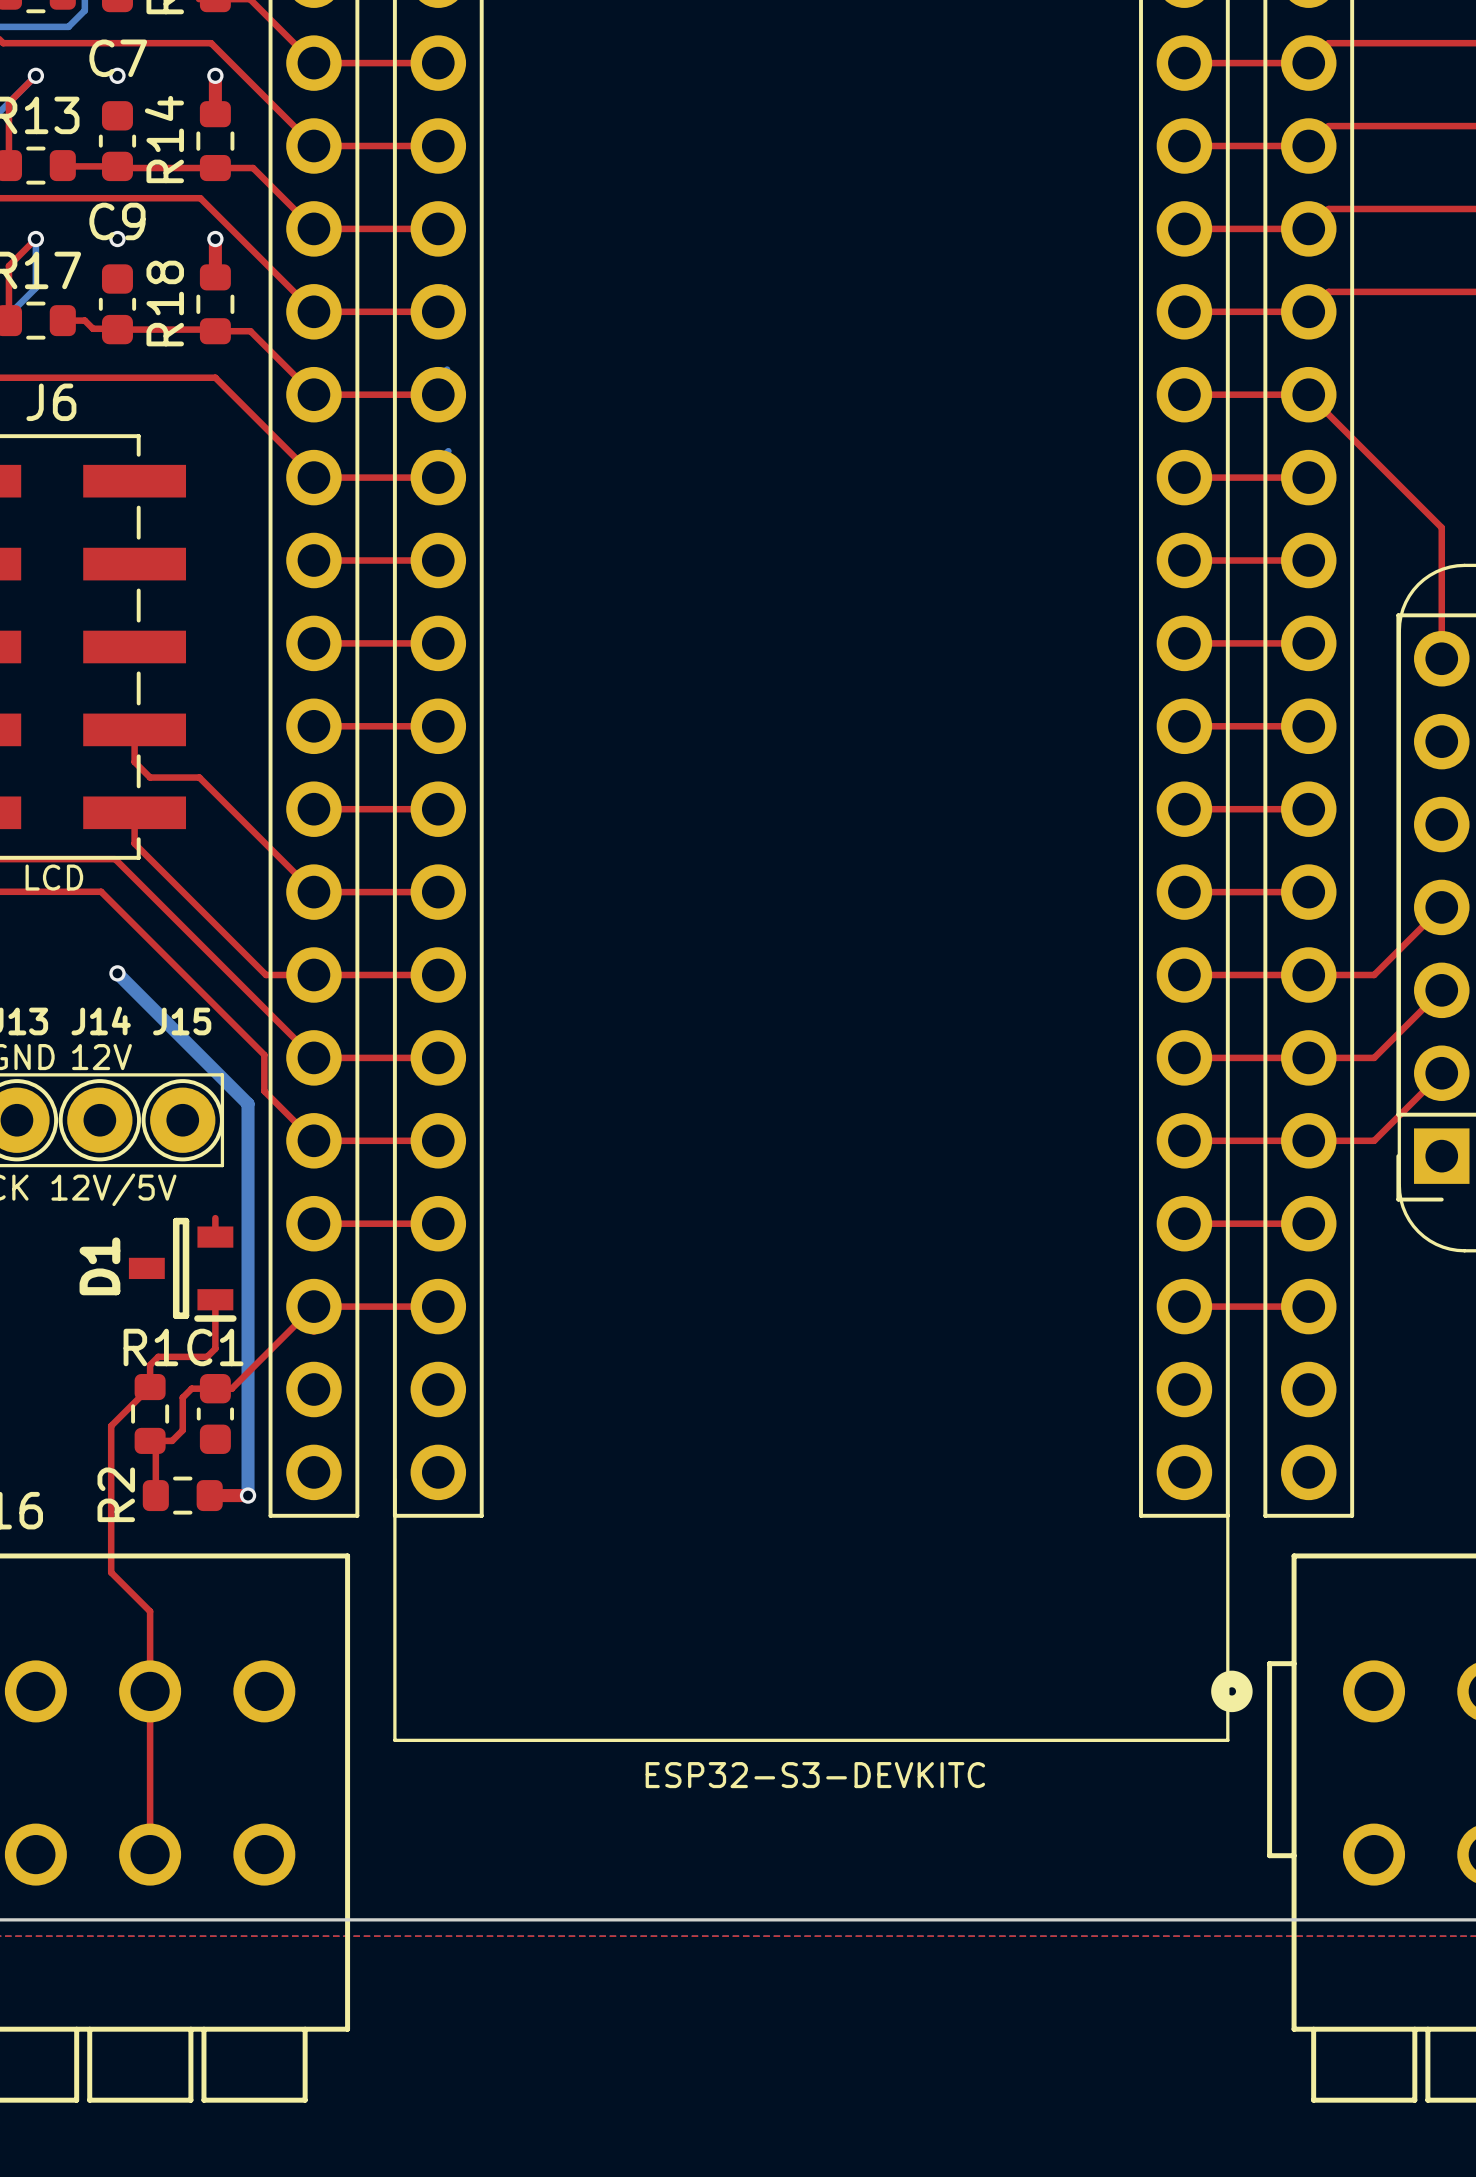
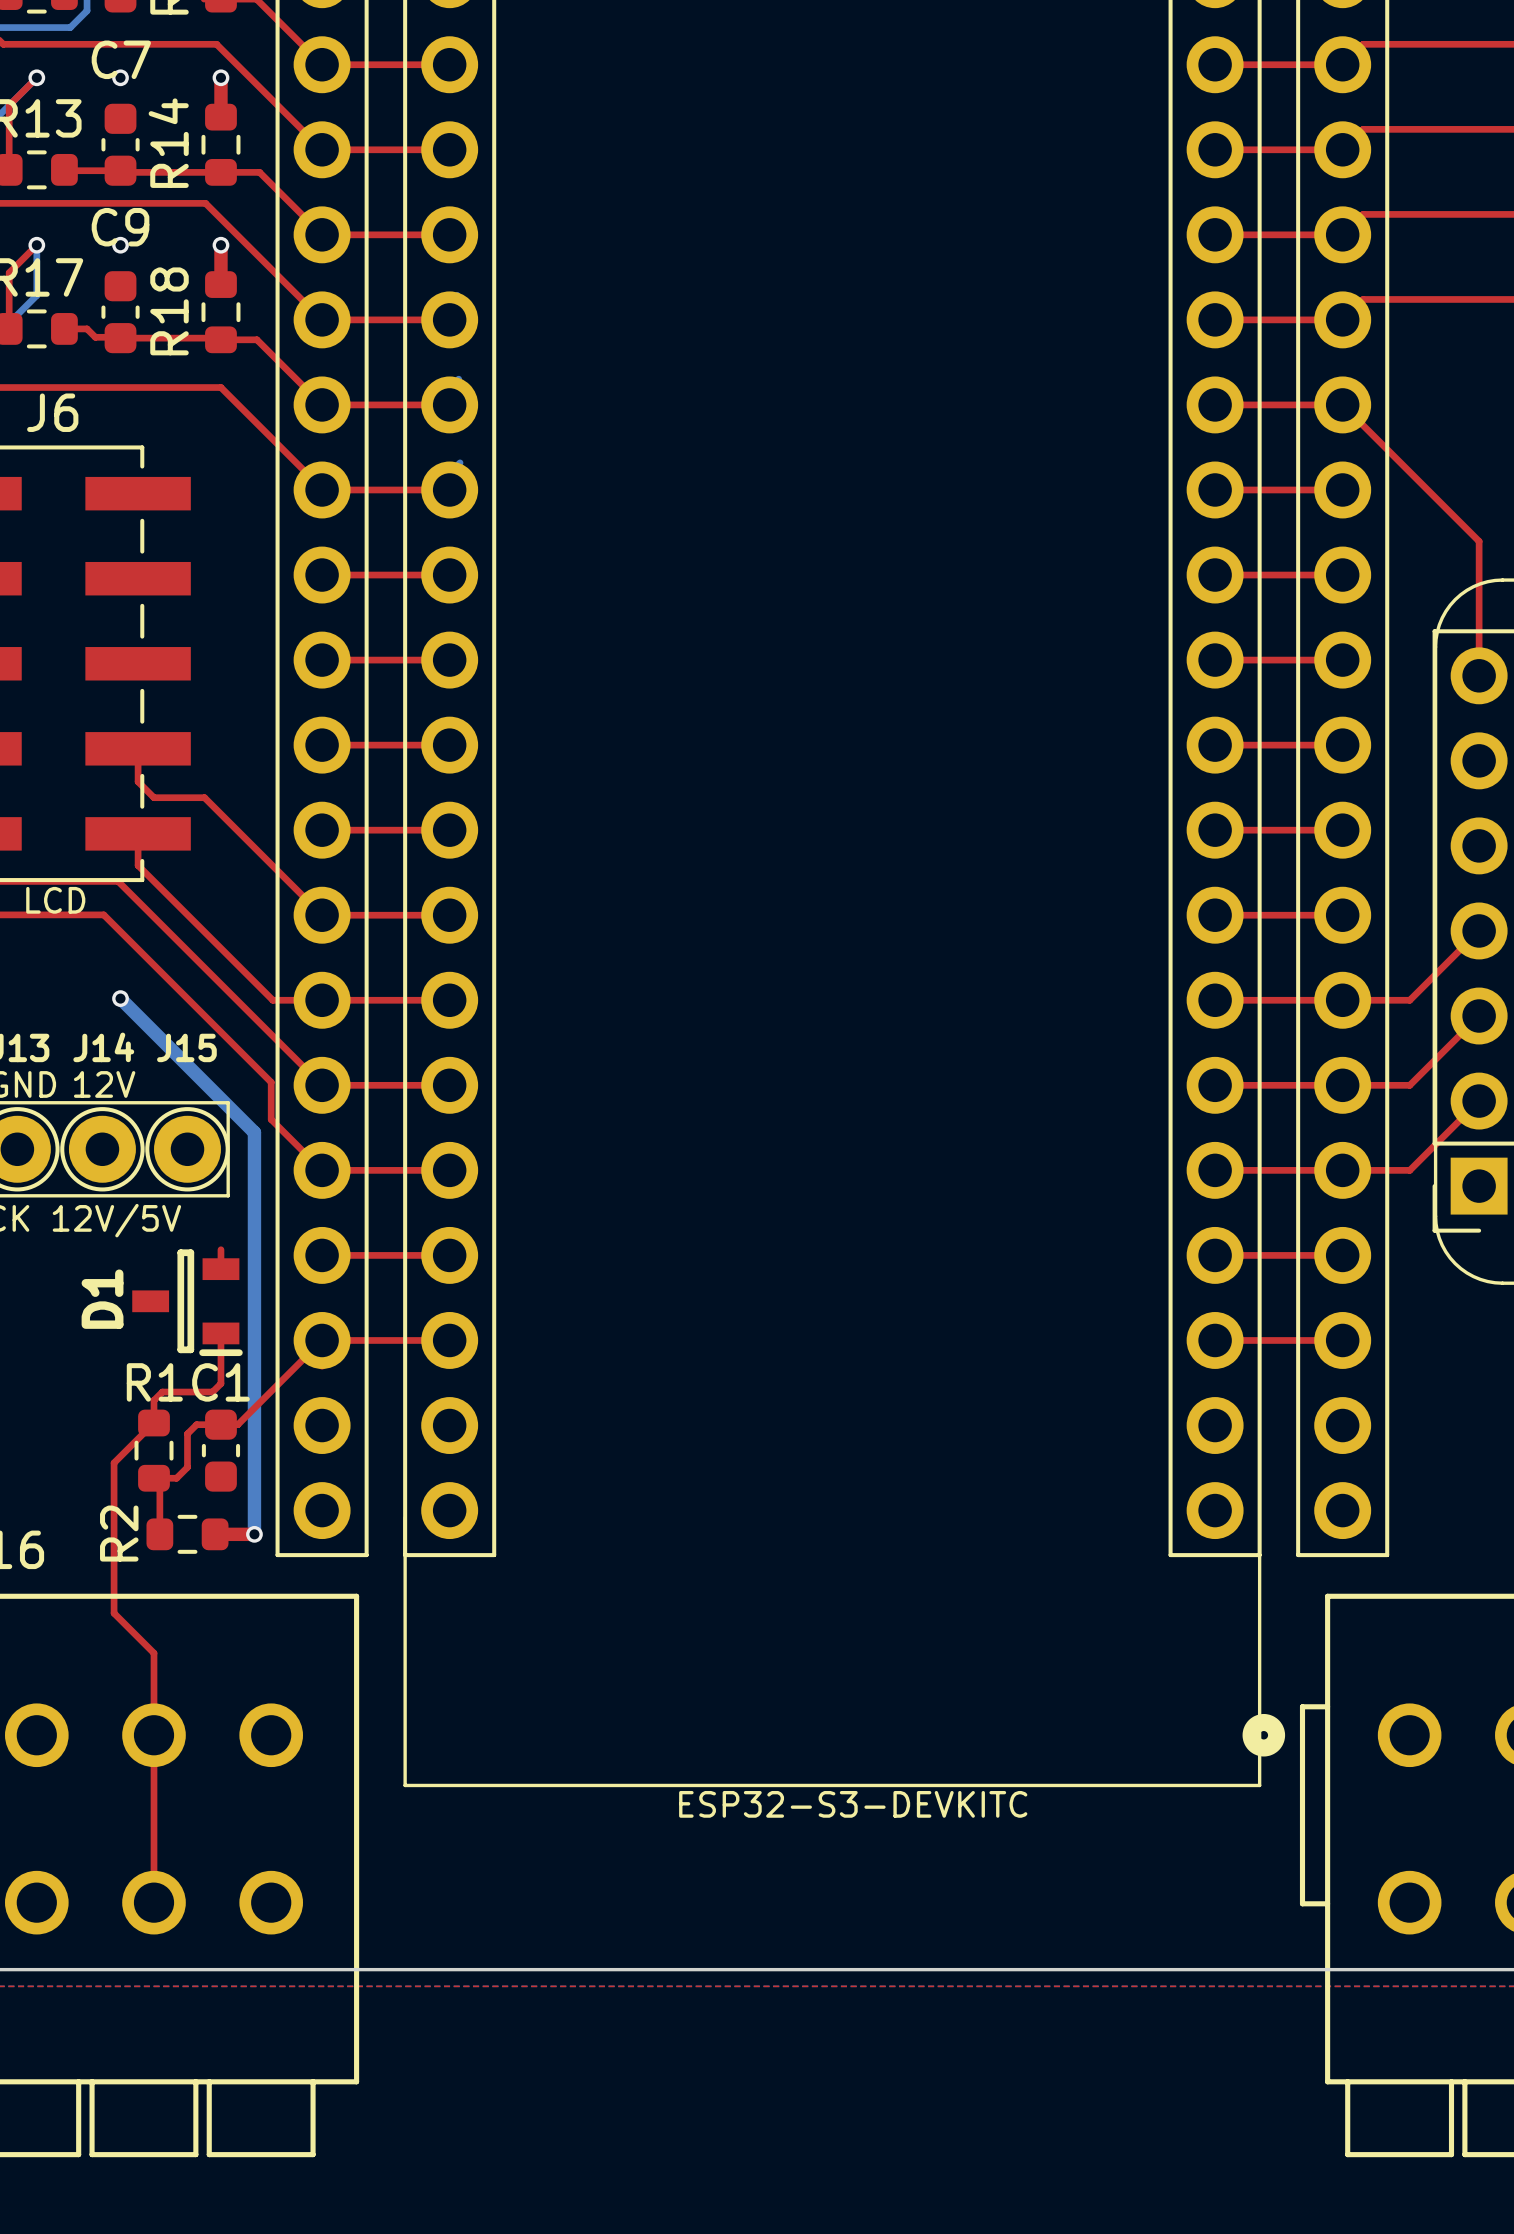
text position: ESP32-S3-DEVKITC (815, 1775) -> ESP32-S3-DEVKITC (853, 1804)

